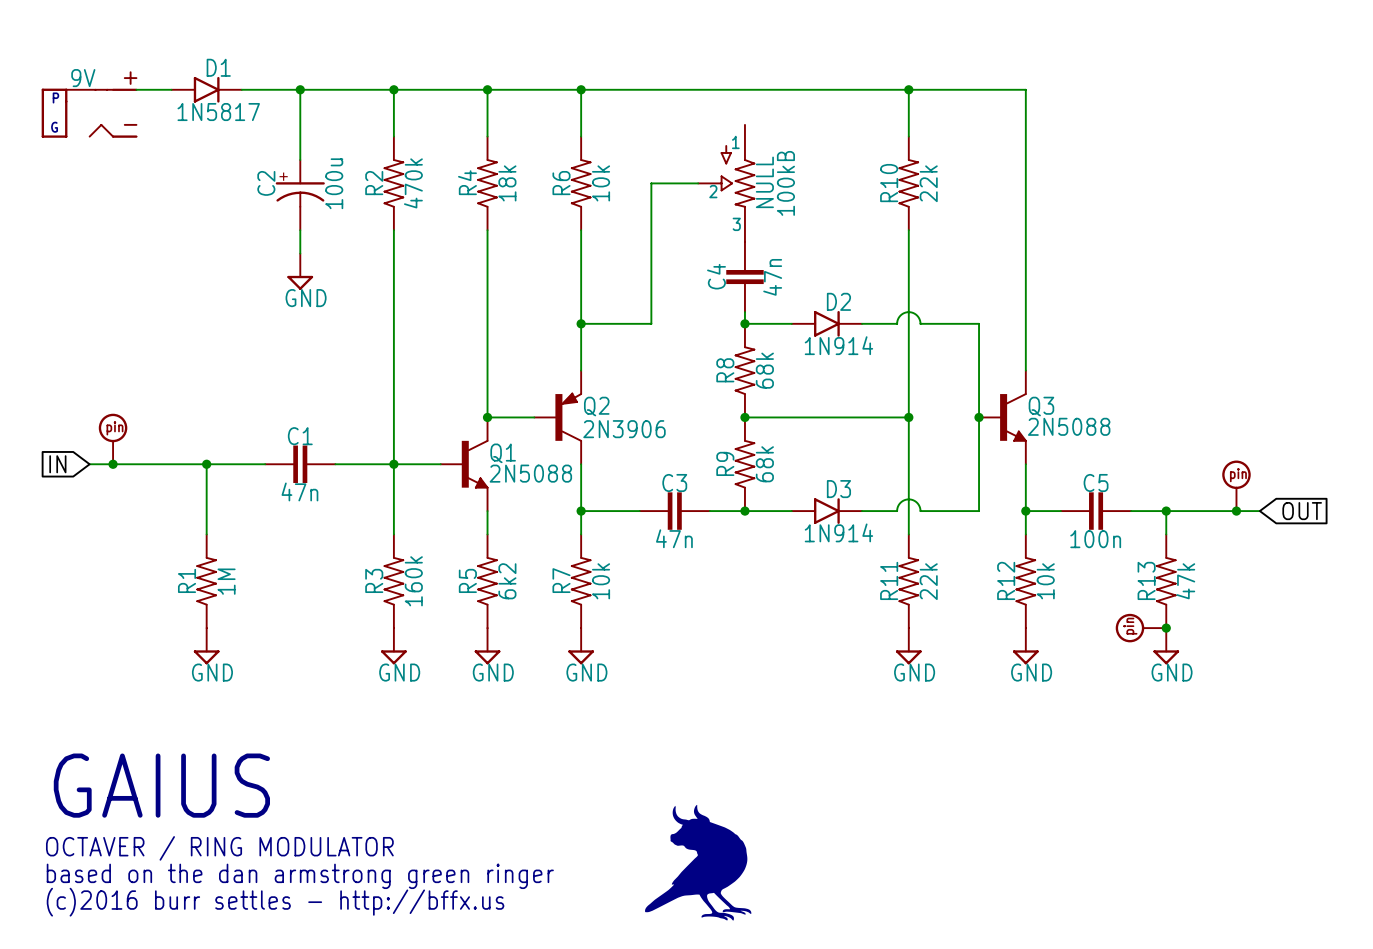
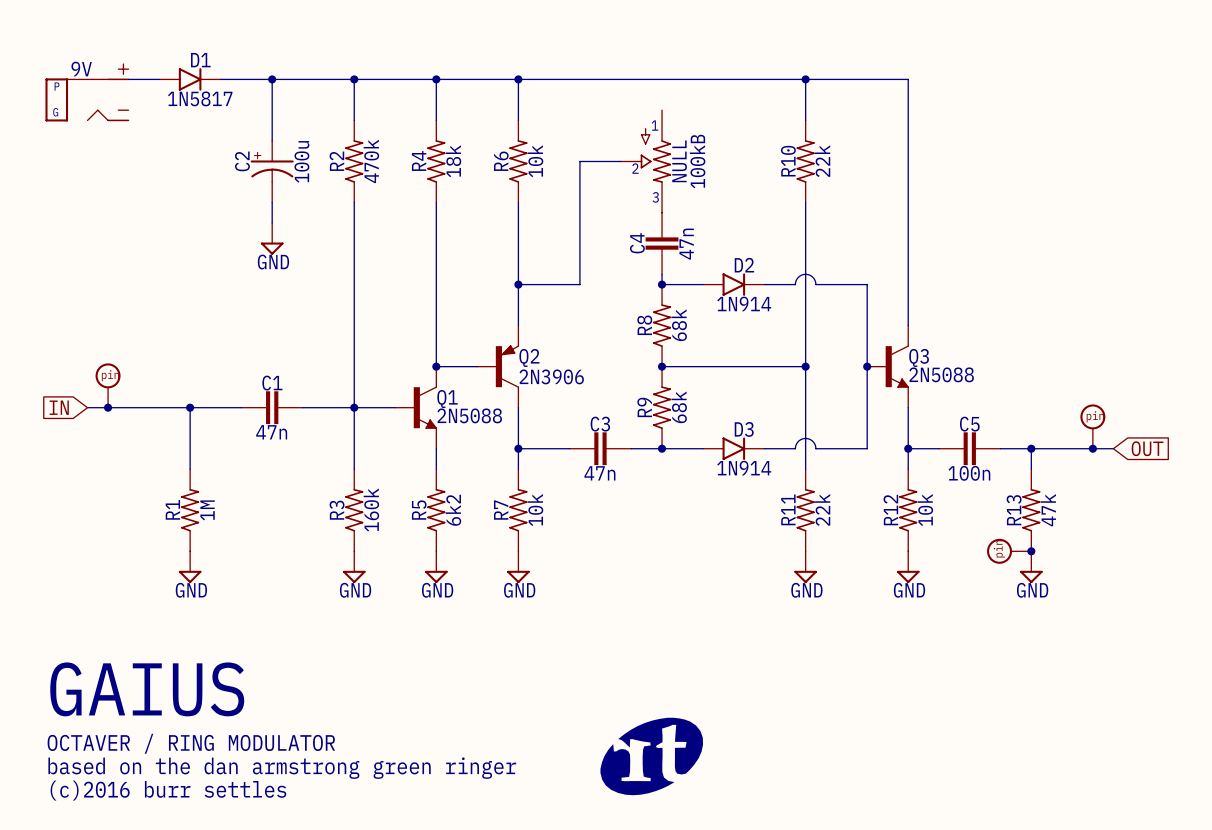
part: (698, 862) -> none
part: none -> (651, 756)
text: (c)2016 burr settles - http://bffx.us (275, 902) -> (c)2016 burr settles (168, 790)

